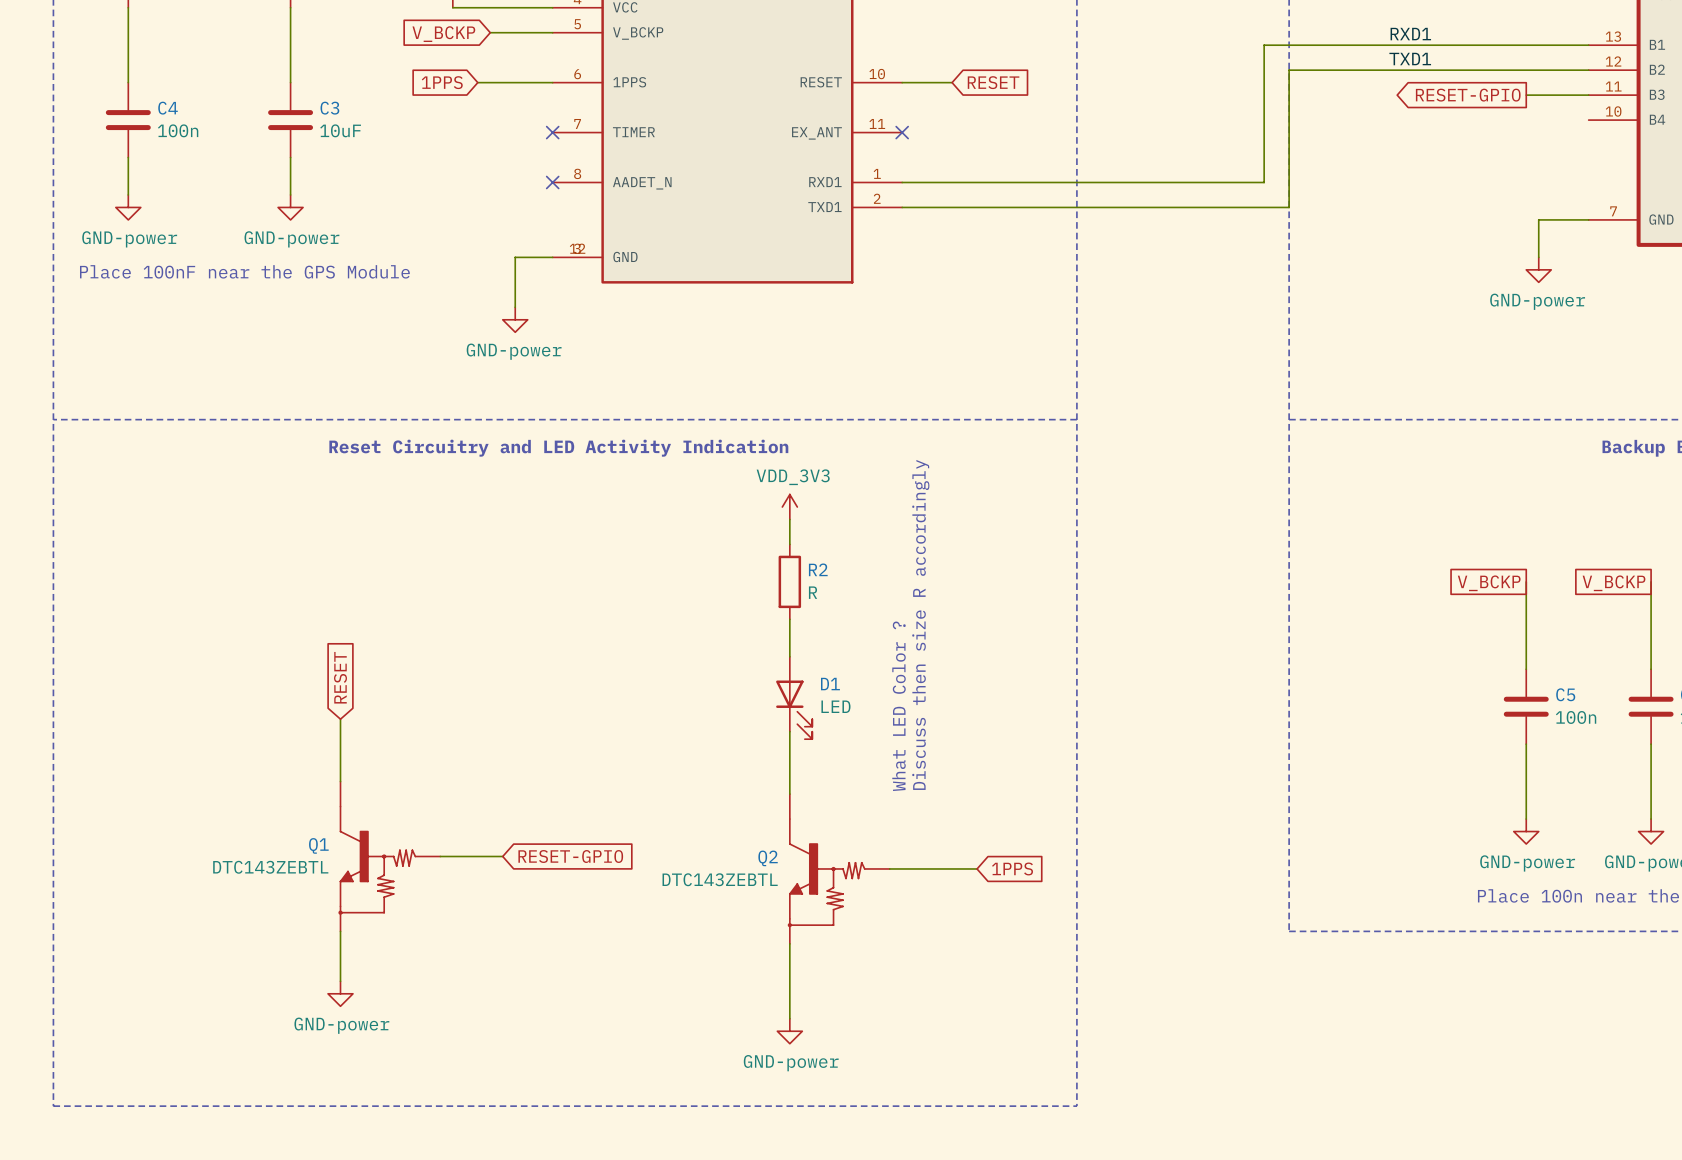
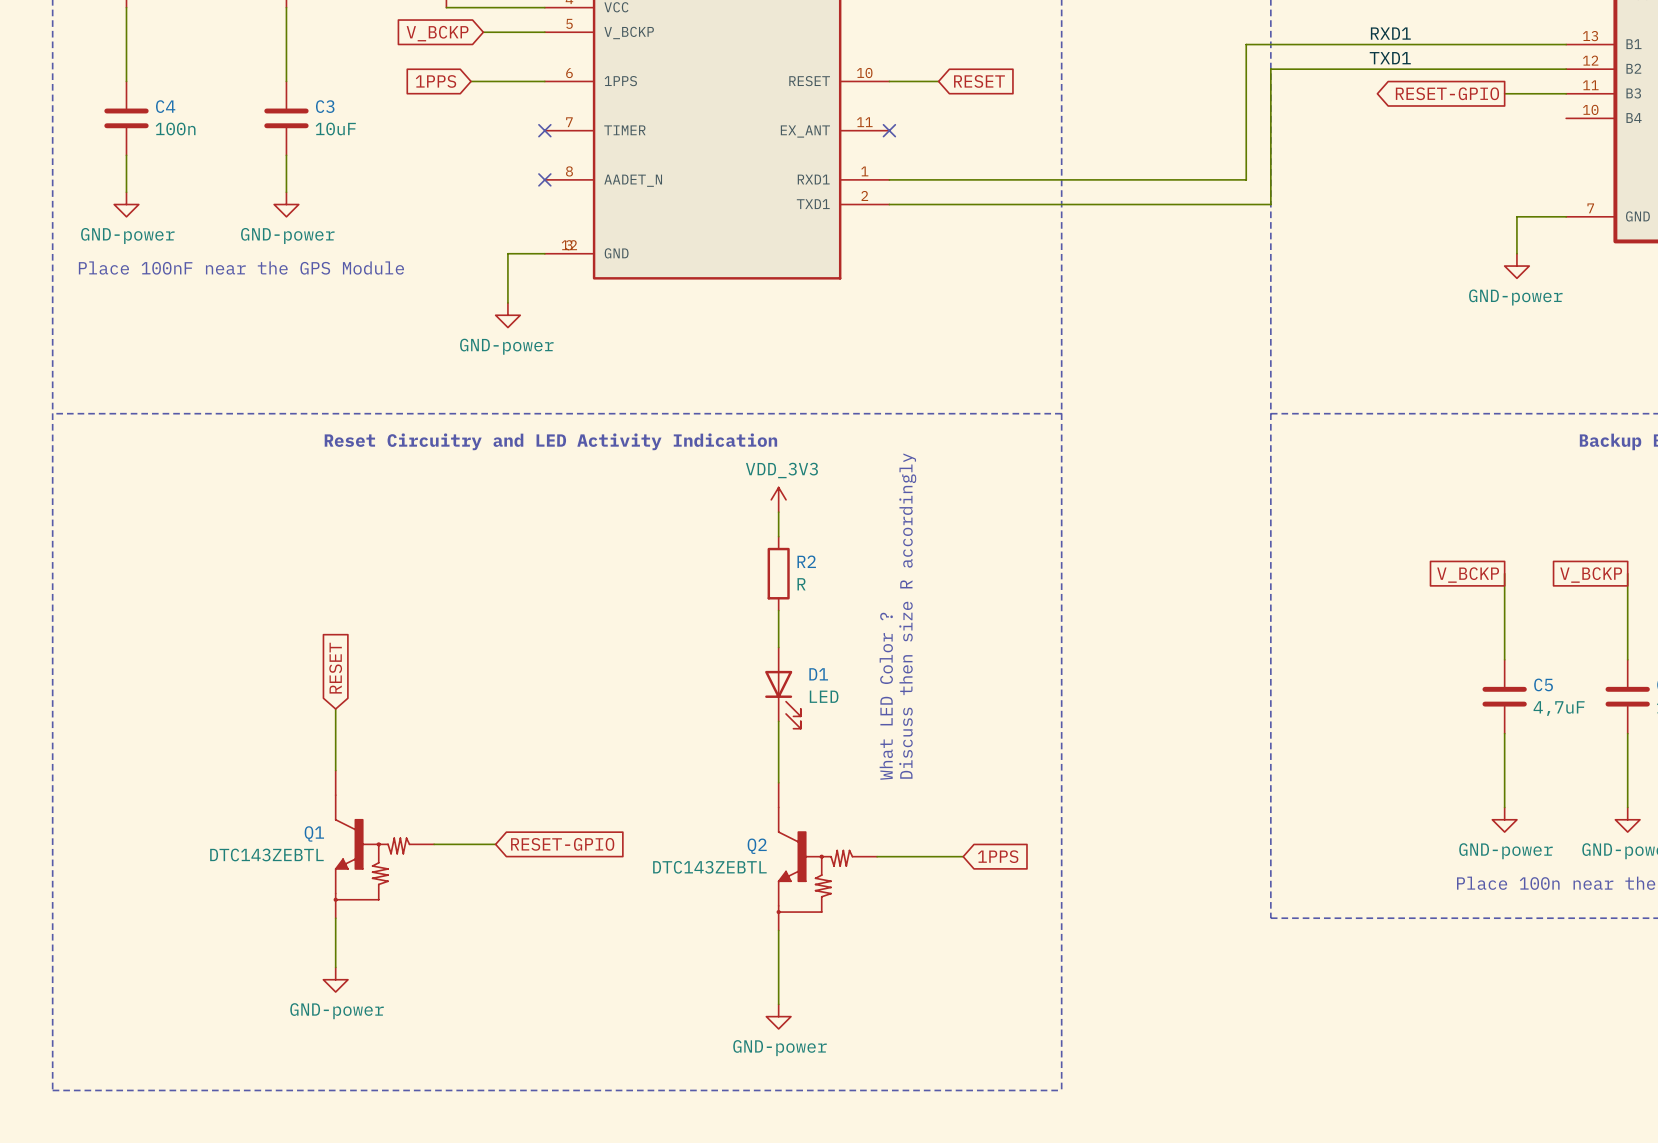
C5 value: 100n (1576, 717) -> 4,7uF (1559, 708)

